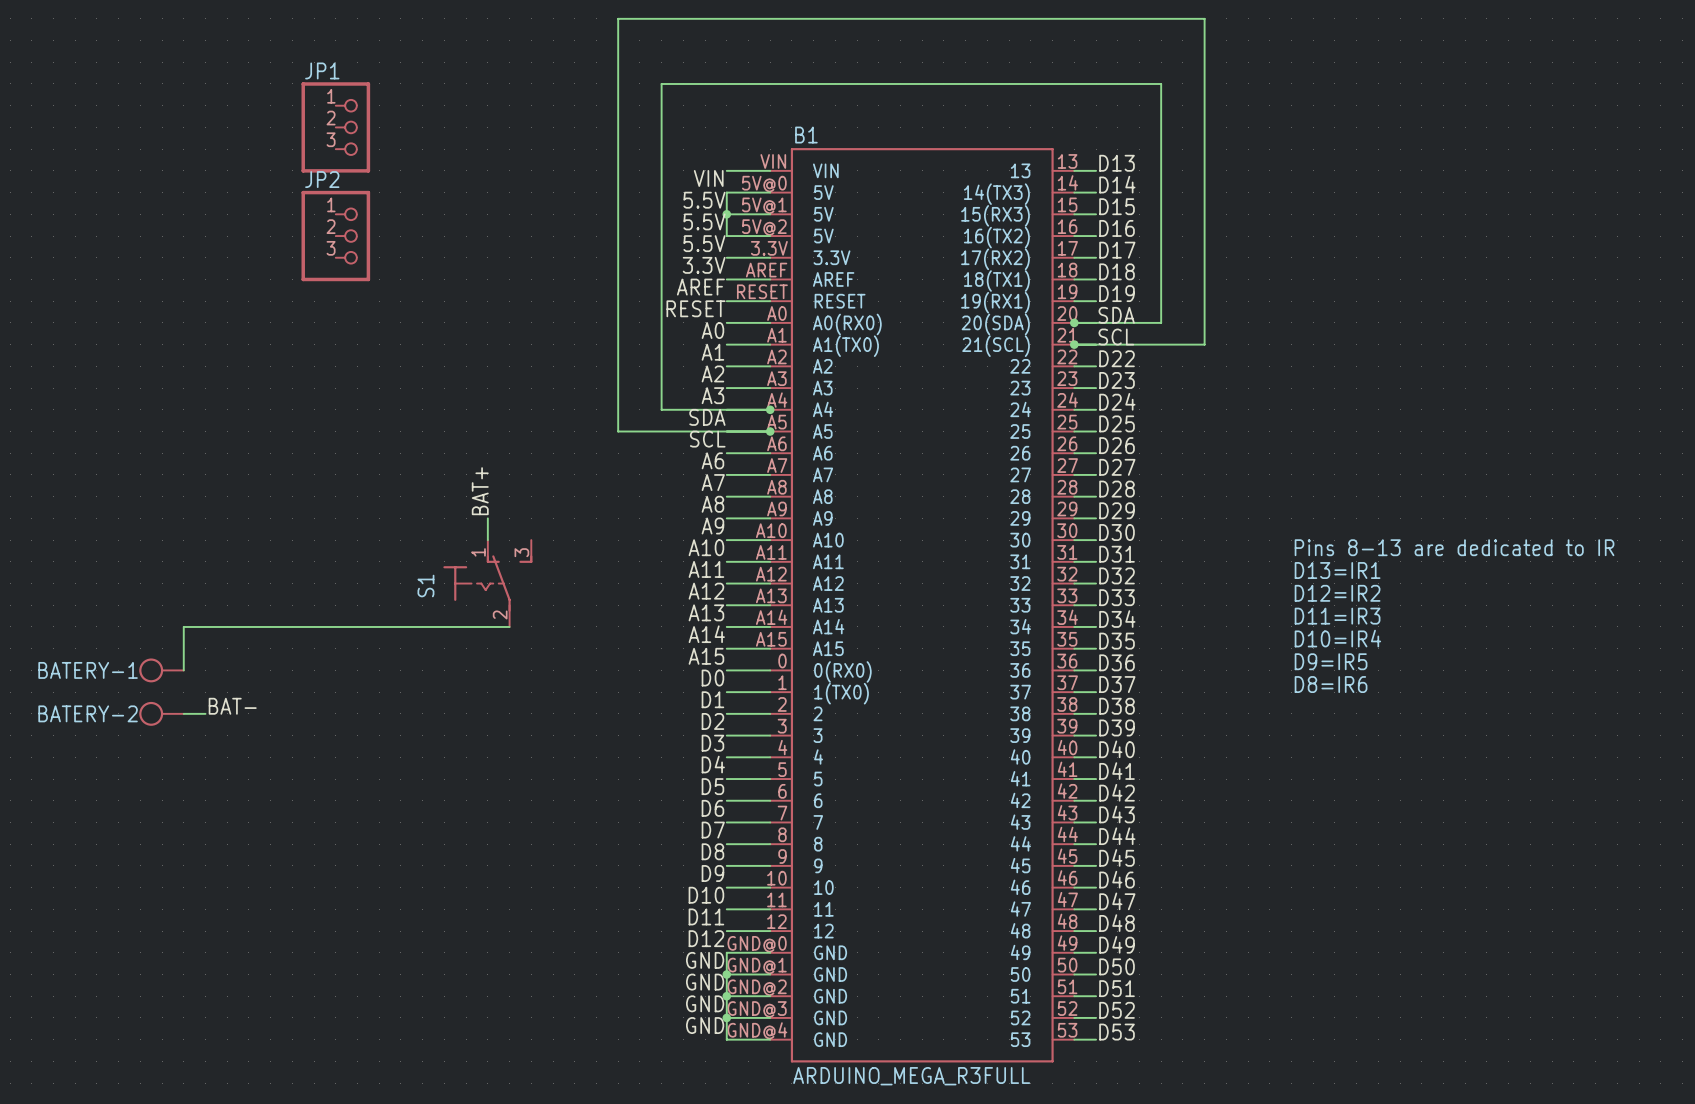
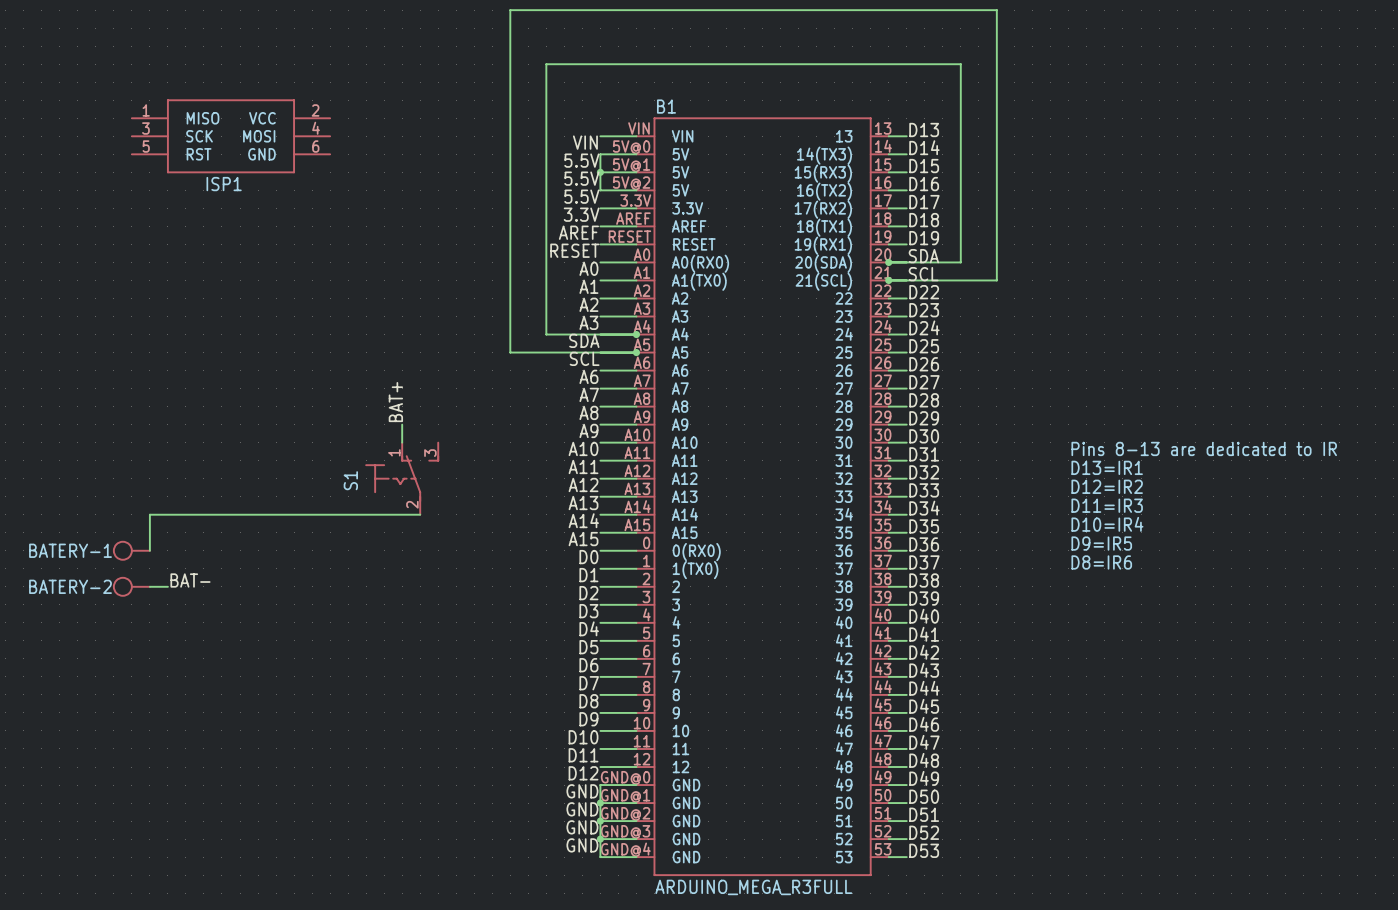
JP1: (335, 127) -> none
ISP1: none -> (230, 136)
JP2: (335, 236) -> none

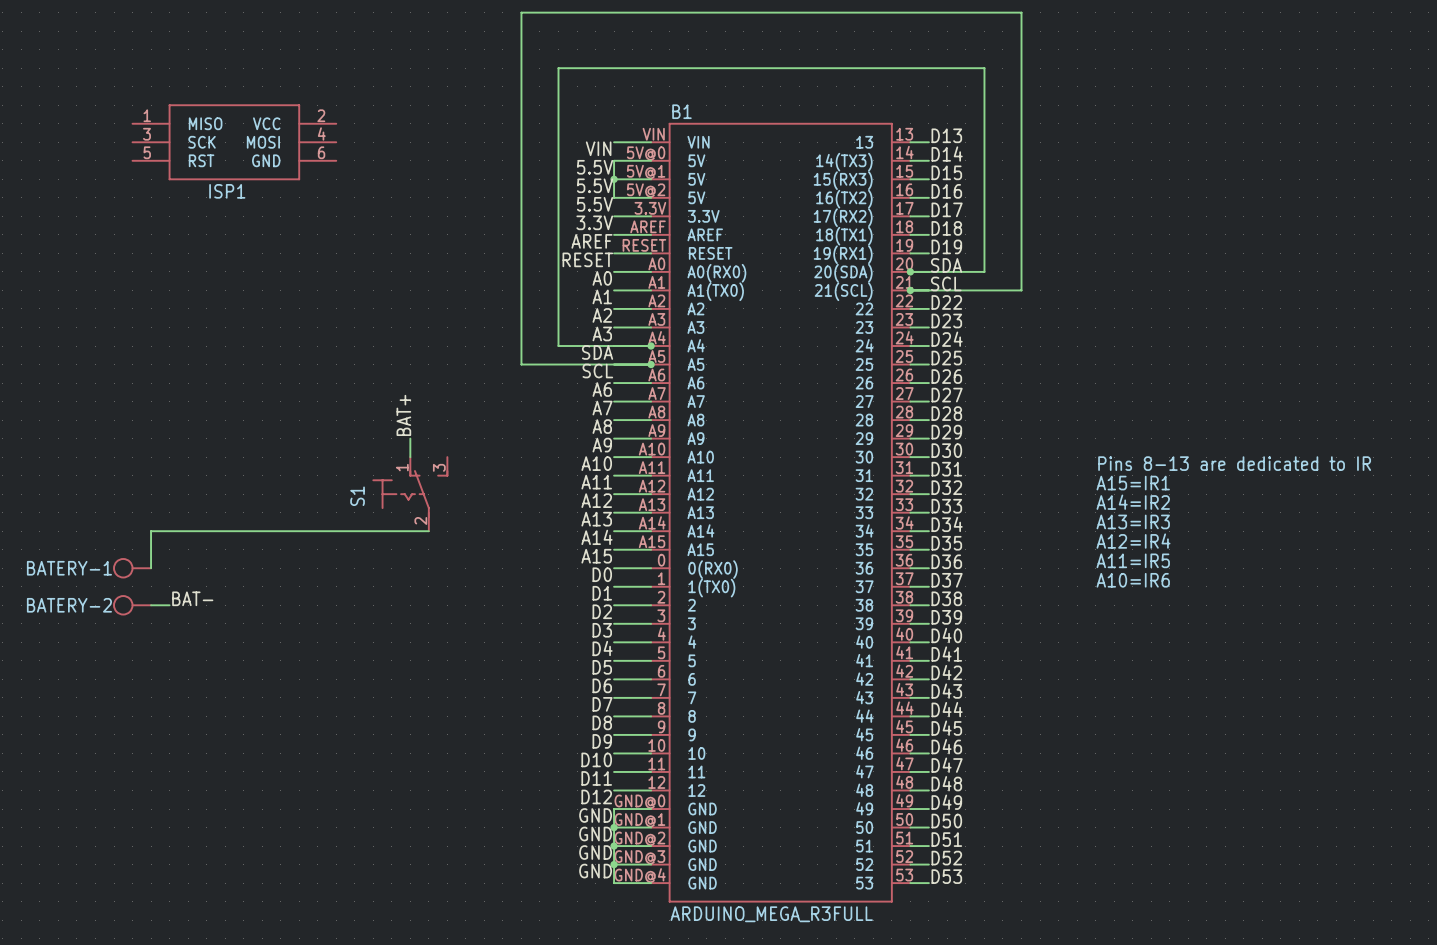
text: D13=IR1 (1107, 467) -> A15=IR1 (1133, 483)
text: D12=IR2 (1107, 486) -> A14=IR2 (1133, 502)
text: D11=IR3 (1107, 505) -> A13=IR3 (1133, 521)
text: D10=IR4 (1107, 524) -> A12=IR4 (1133, 541)
text: D9=IR5 (1101, 543) -> A11=IR5 (1133, 560)
text: D8=IR6 (1101, 562) -> A10=IR6 (1133, 580)

